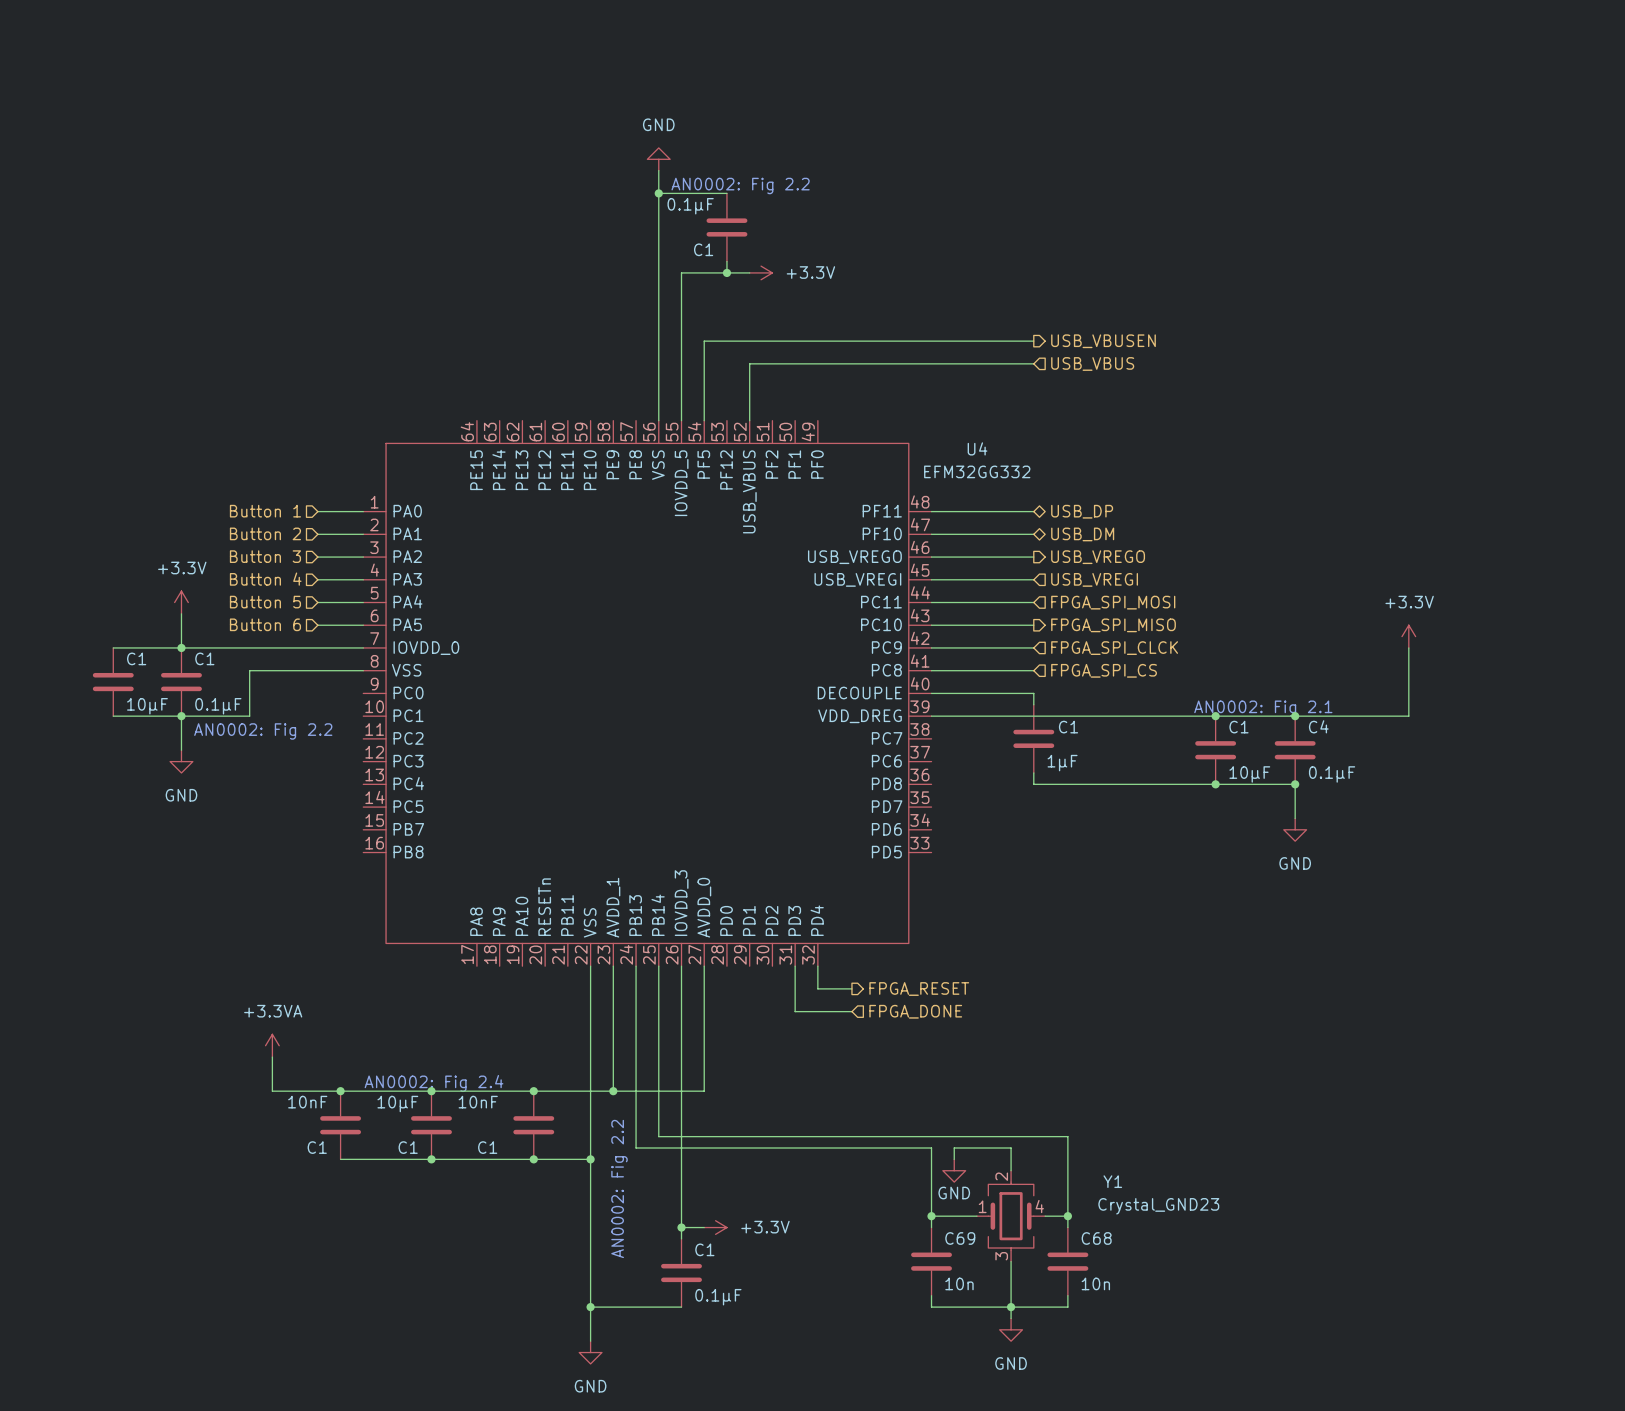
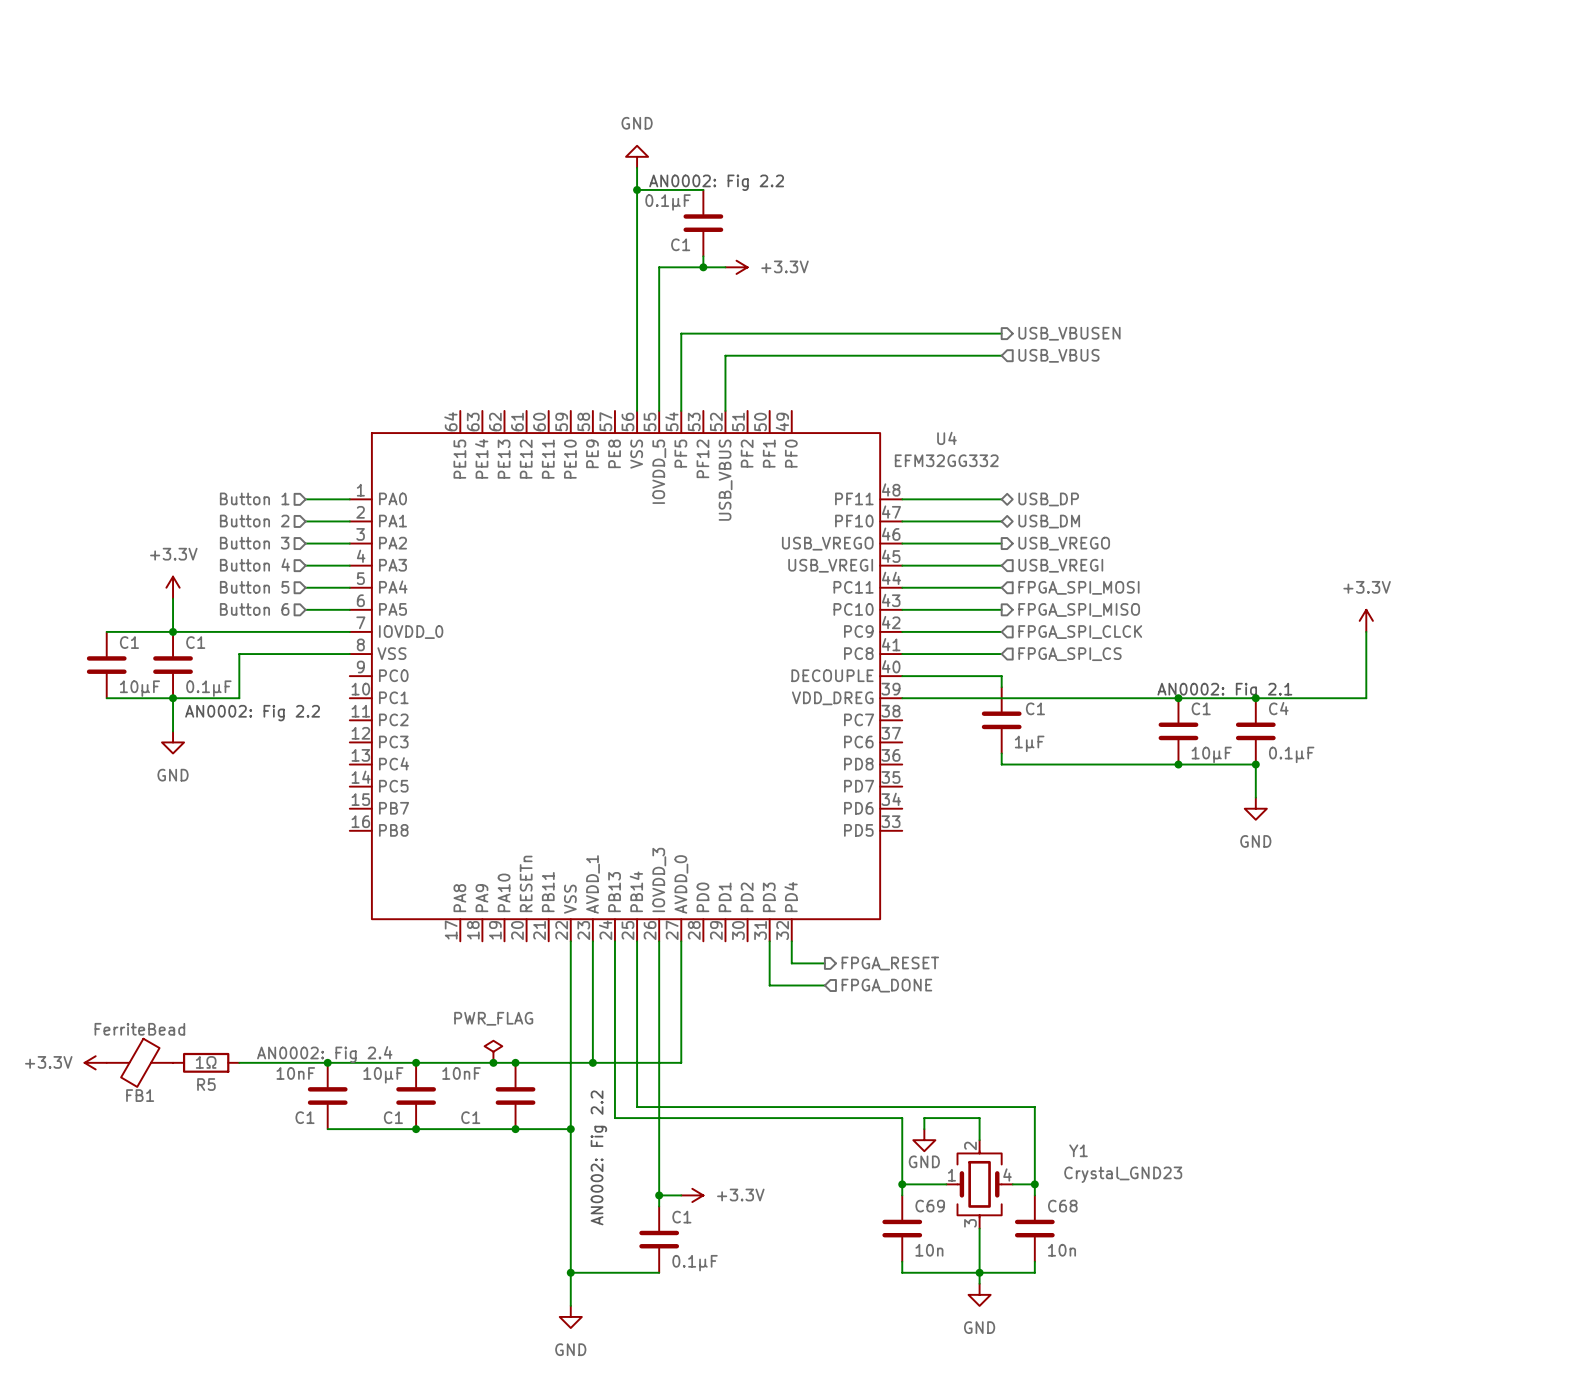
power symbol: +3.3VA (272, 1045) -> none
wire: (272, 1057) (272, 1091) -> (239, 1062) (261, 1062)
power symbol: none -> PWR_FLAG (493, 1051)
label: none -> AN0002: Fig 2.4 (324, 1054)
text: AN0002: Fig 2.4 (434, 1083) -> none
power symbol: none -> +3.3V (95, 1062)
FB1: none -> FerriteBead (139, 1062)
R5: none -> 1Ω (206, 1062)
junction: none -> (493, 1062)

